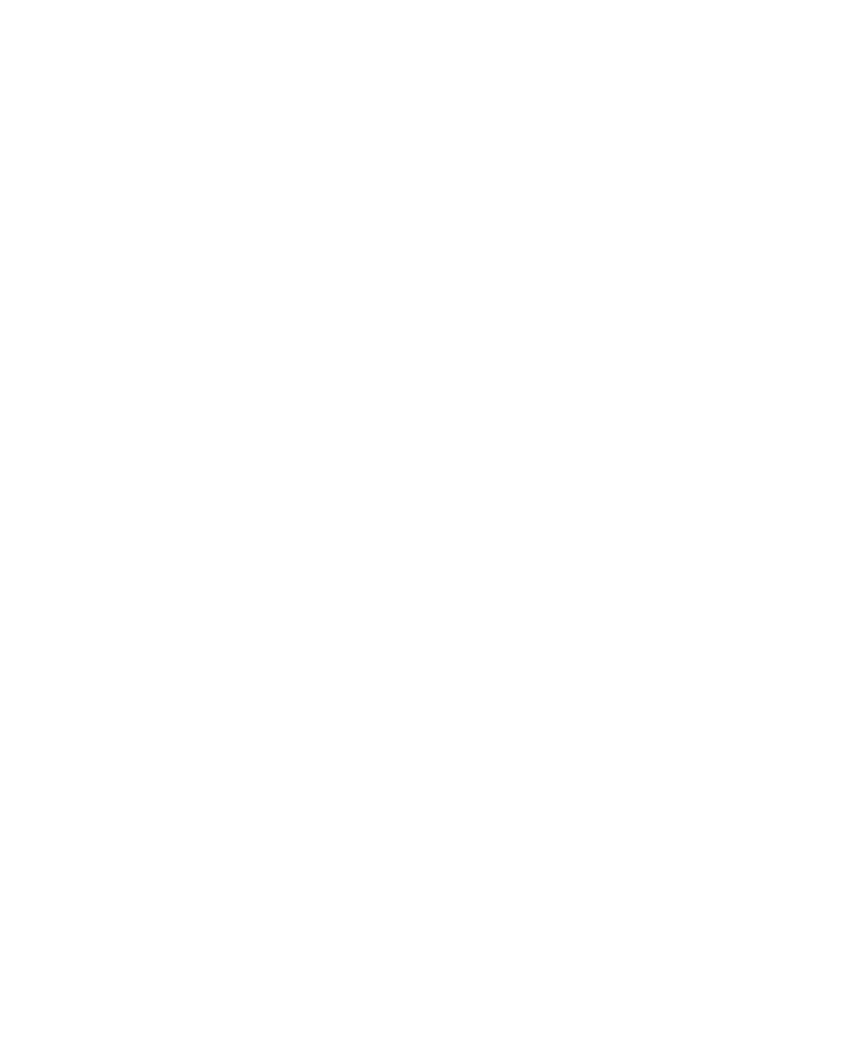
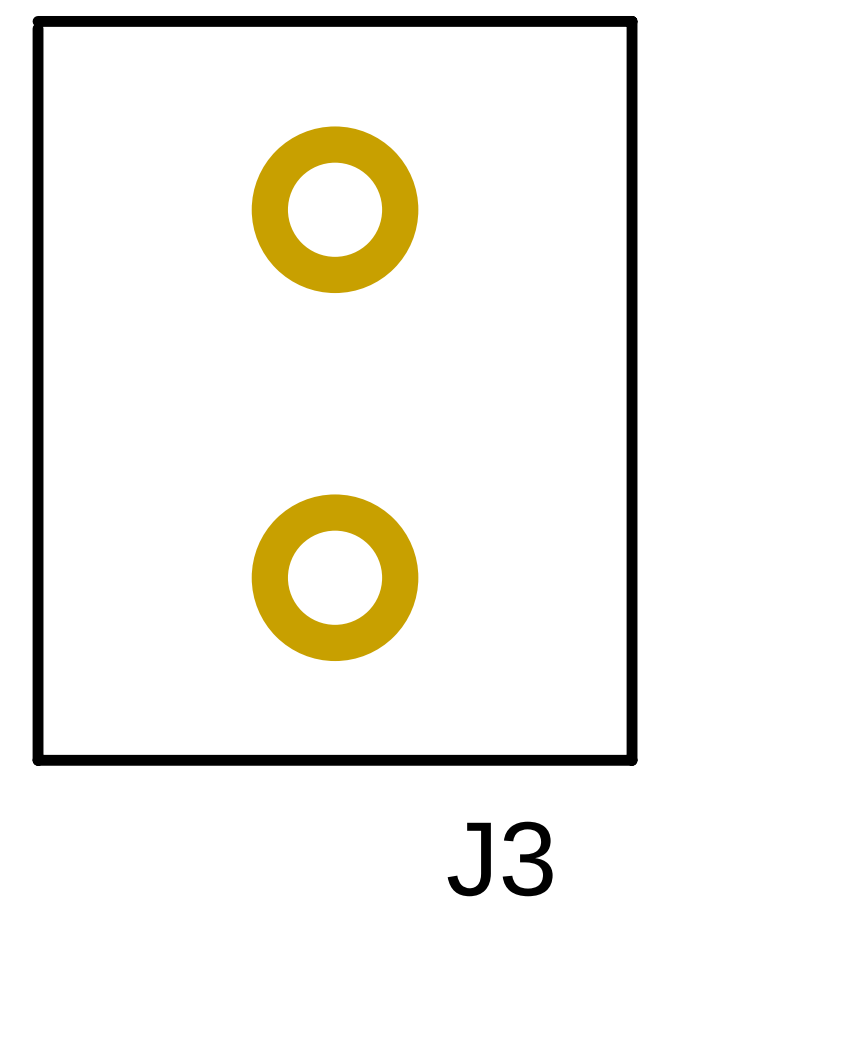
J3: none -> (335, 390)

